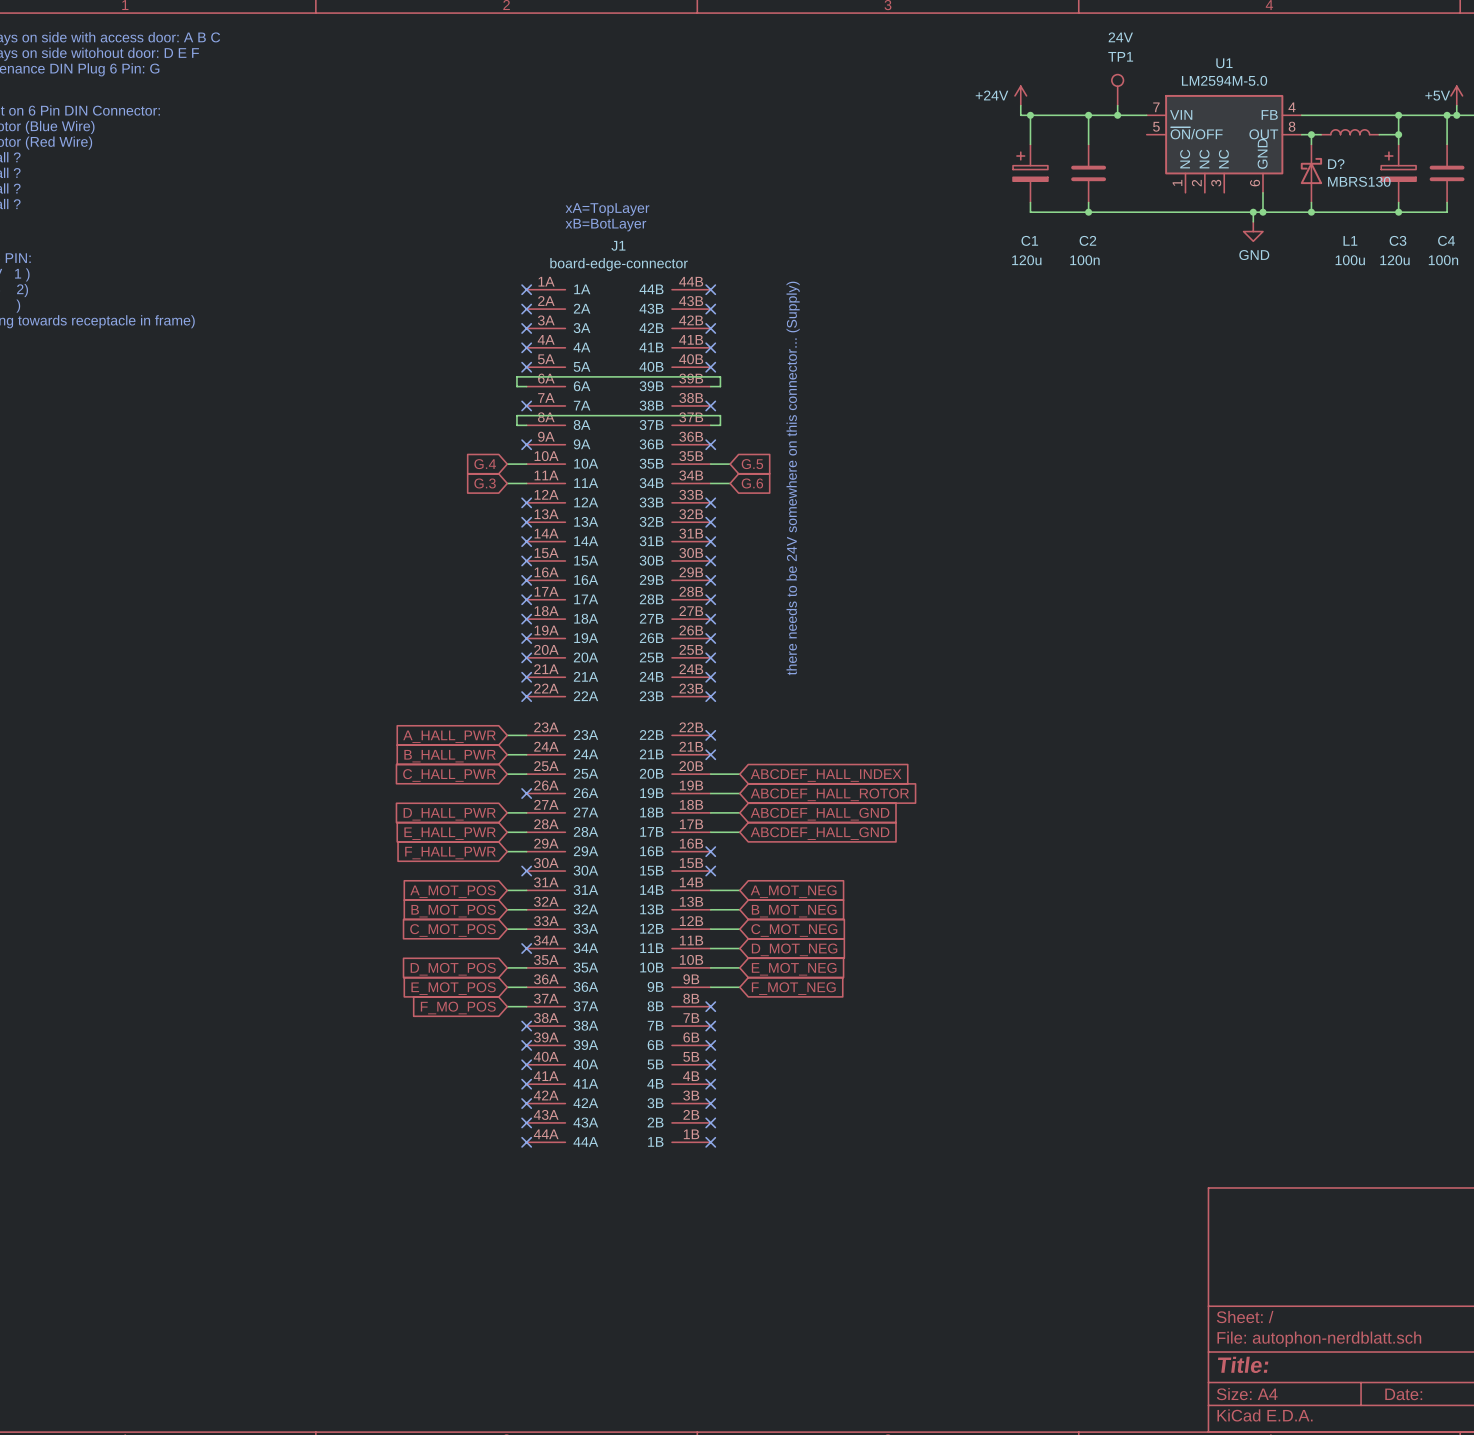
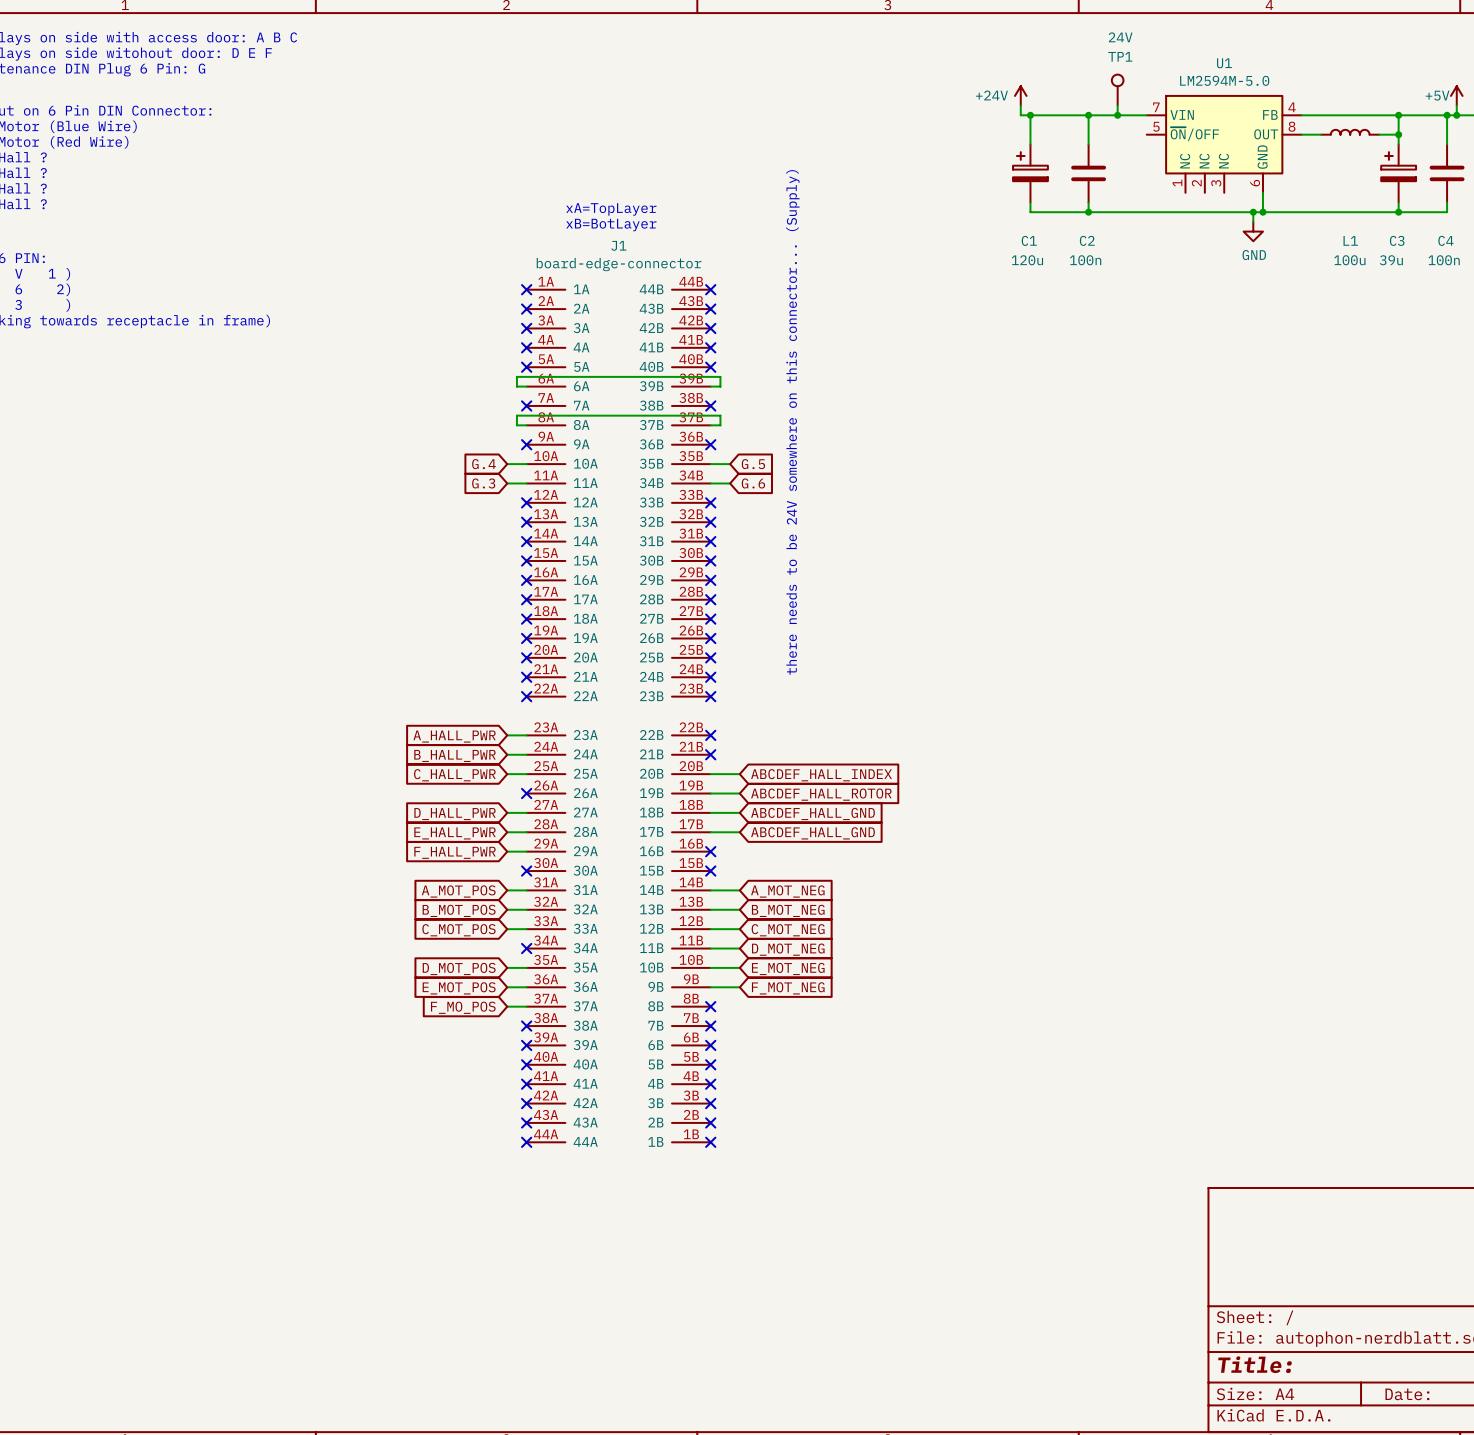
wire: (1311, 134) (1311, 144) -> none
junction: (1311, 134) -> none
D?: MBRS130 (1311, 173) -> none
wire: (1311, 202) (1311, 212) -> none
junction: (1311, 212) -> none
C3 value: 120u (1394, 260) -> 39u (1391, 260)

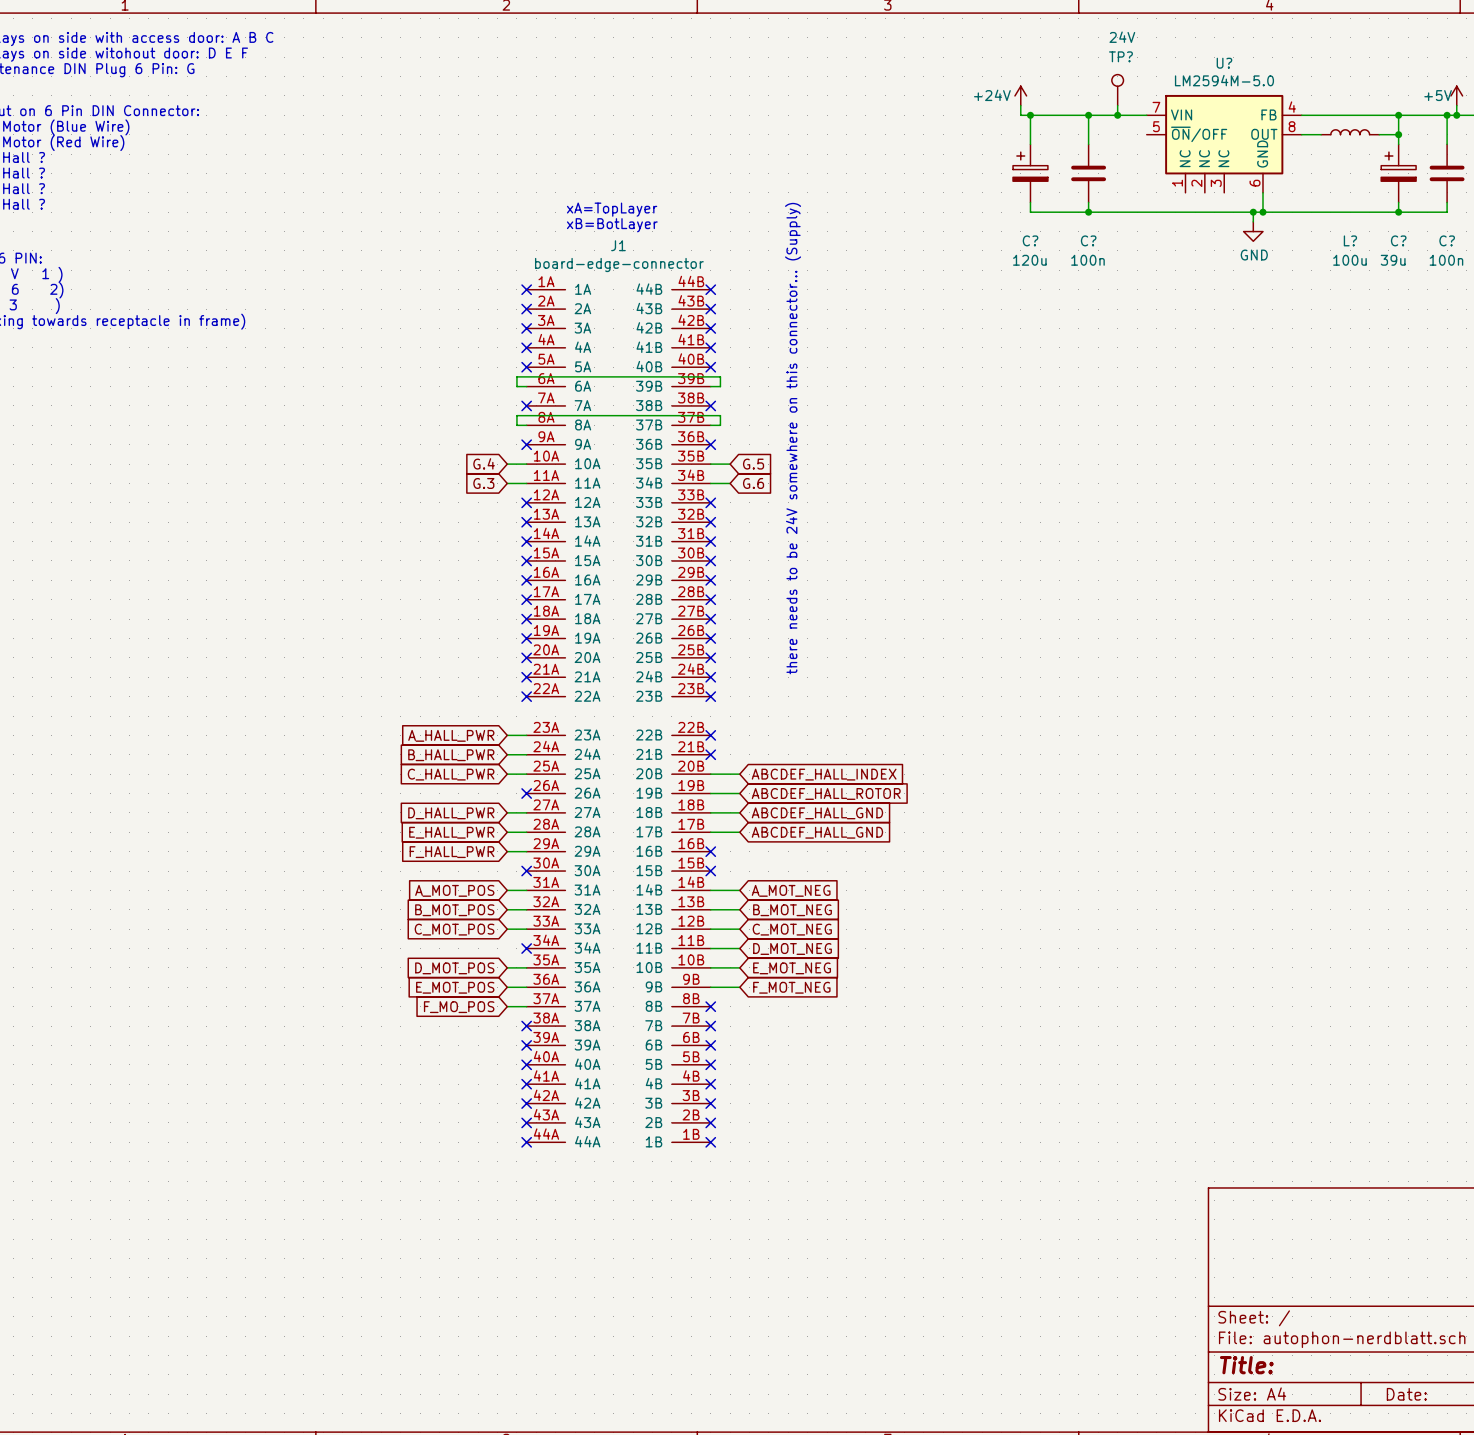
TP1 name: TP1 (1120, 56) -> TP? (1120, 56)
U1 name: U1 (1224, 63) -> U? (1224, 63)
C1 name: C1 (1029, 240) -> C? (1030, 240)
C2 name: C2 (1087, 240) -> C? (1088, 240)
L1 name: L1 (1350, 240) -> L? (1350, 240)
C3 name: C3 (1397, 240) -> C? (1398, 240)
C4 name: C4 (1445, 240) -> C? (1447, 240)

